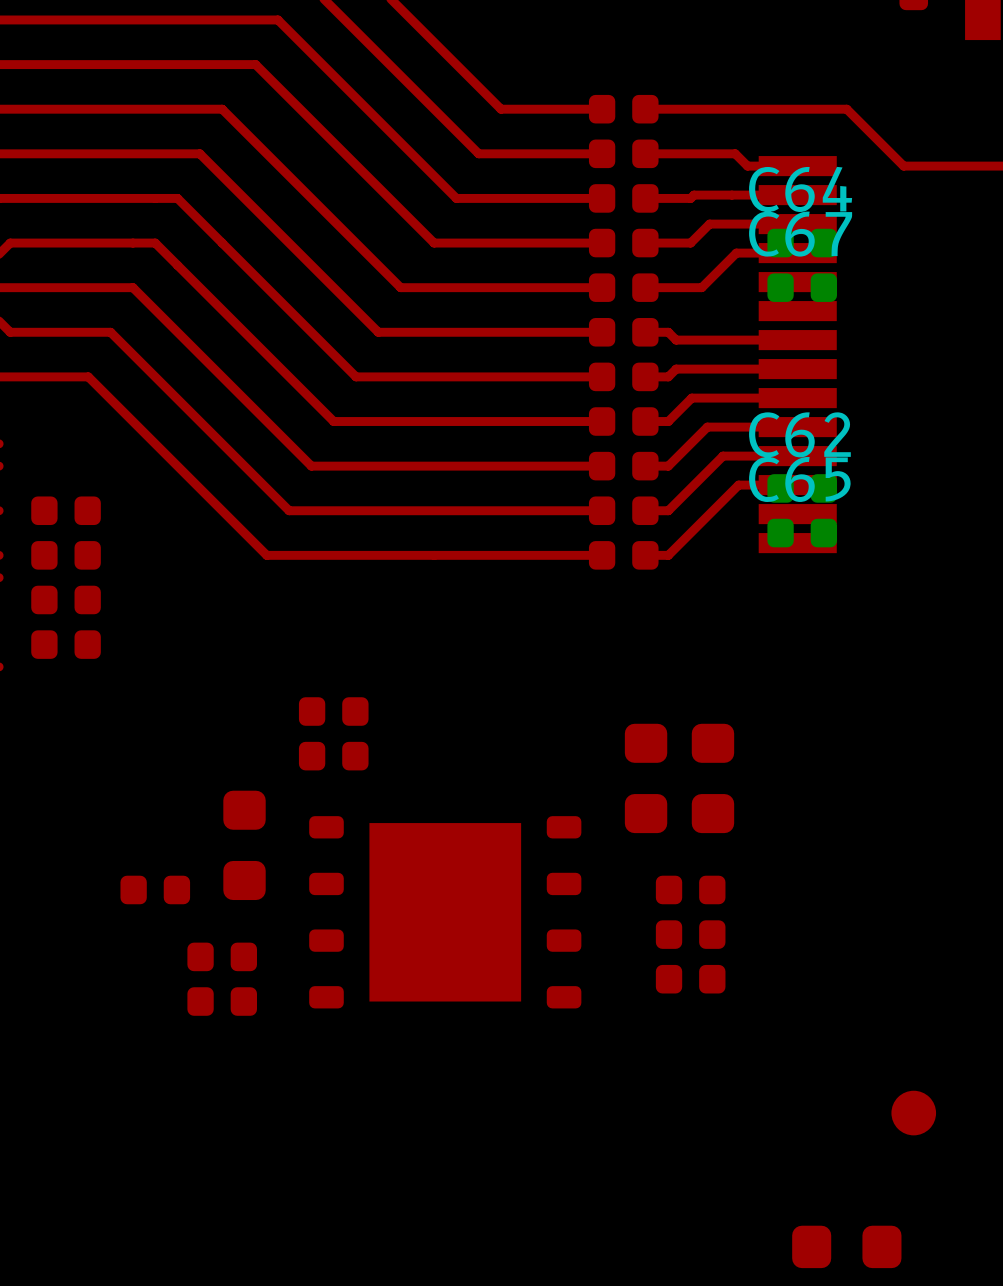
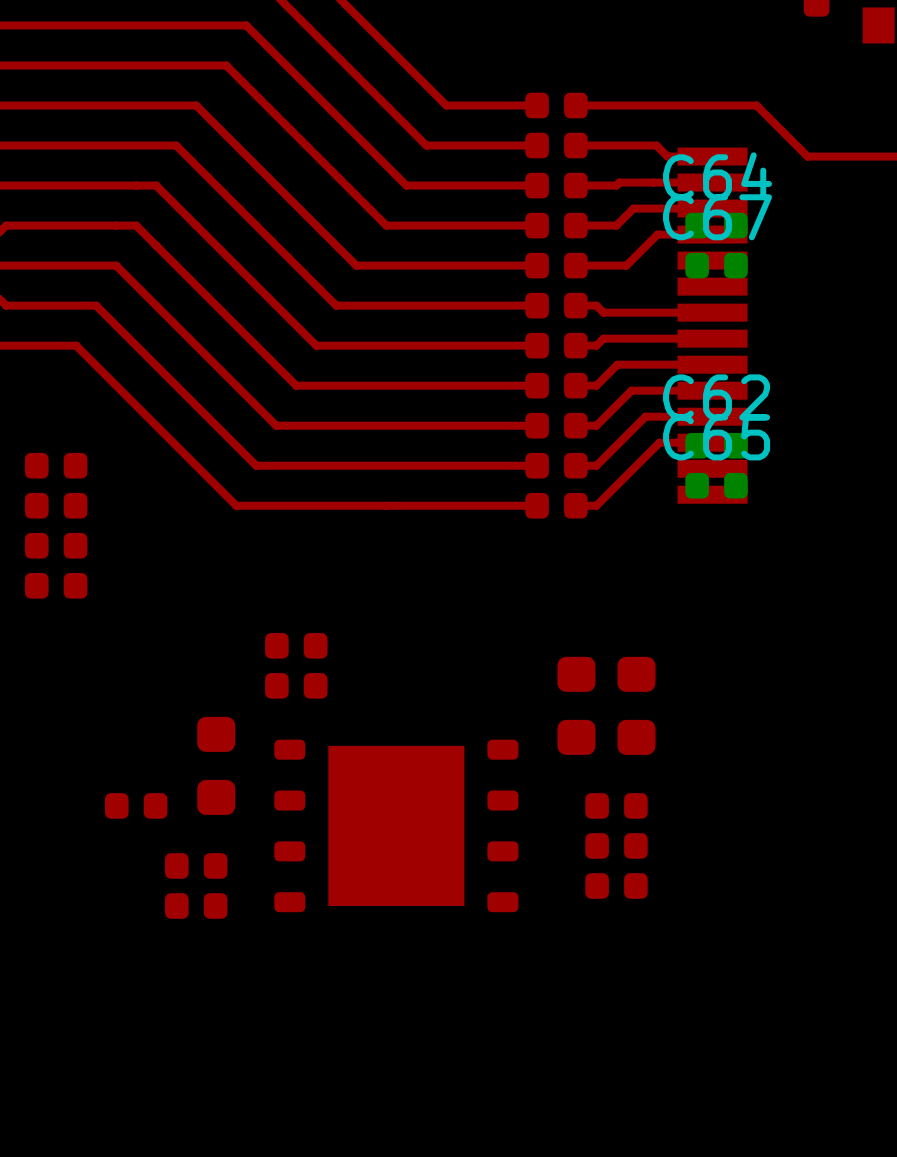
part: (913, 1113) -> none
part: (846, 1246) -> none

